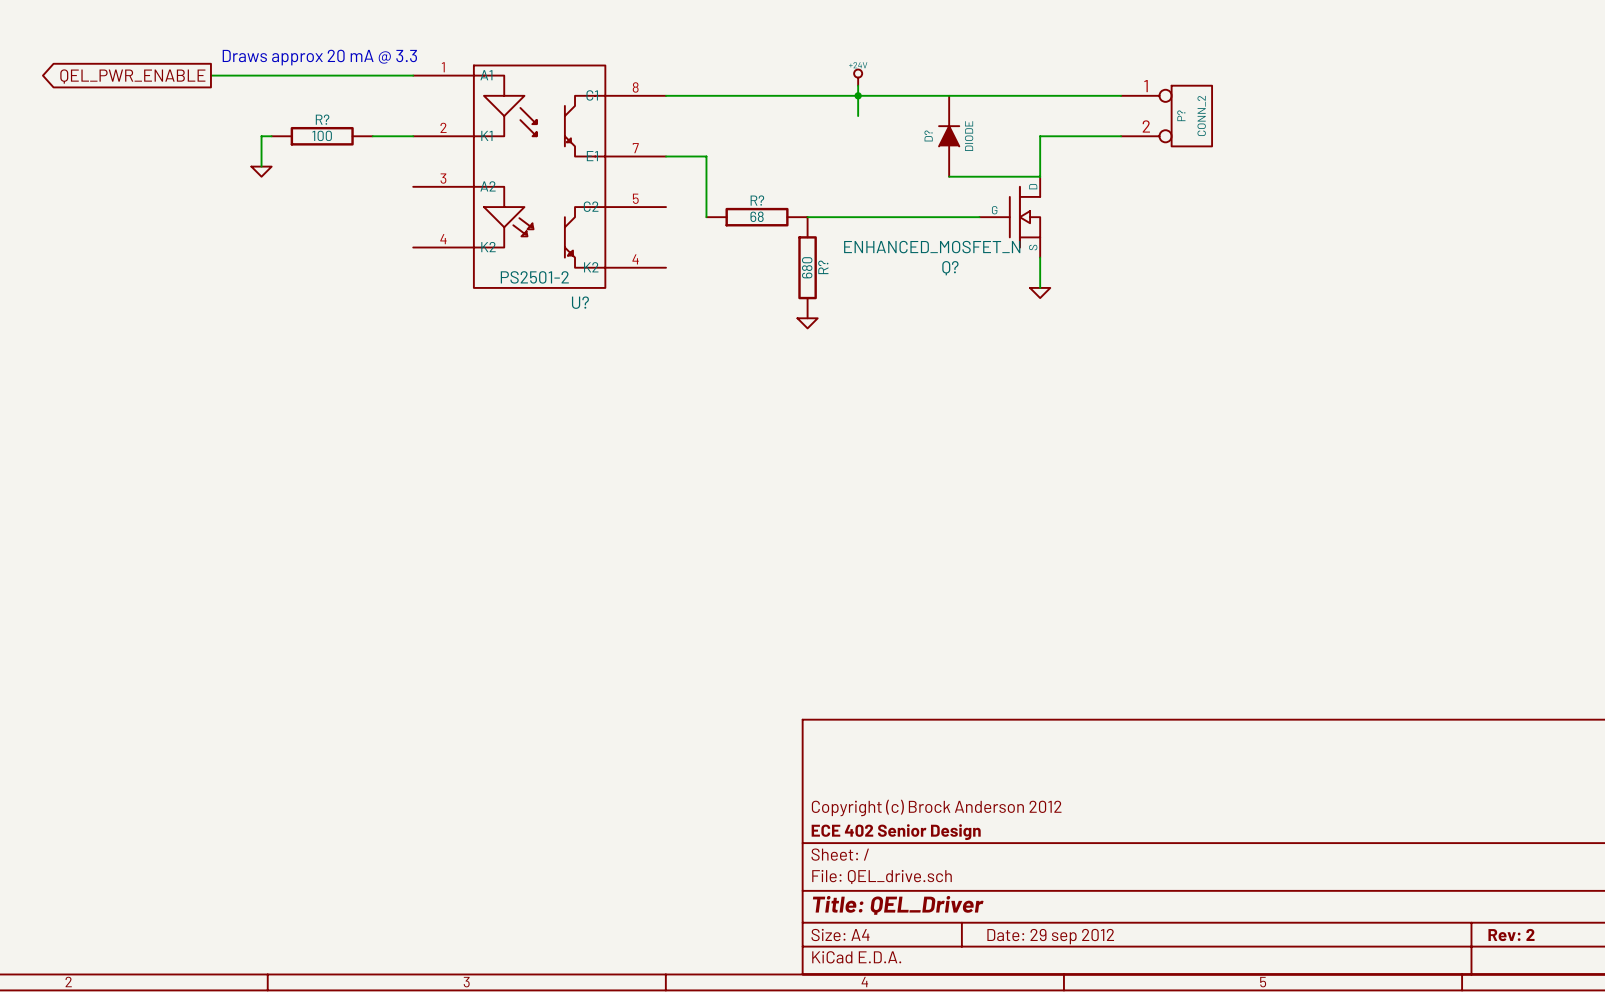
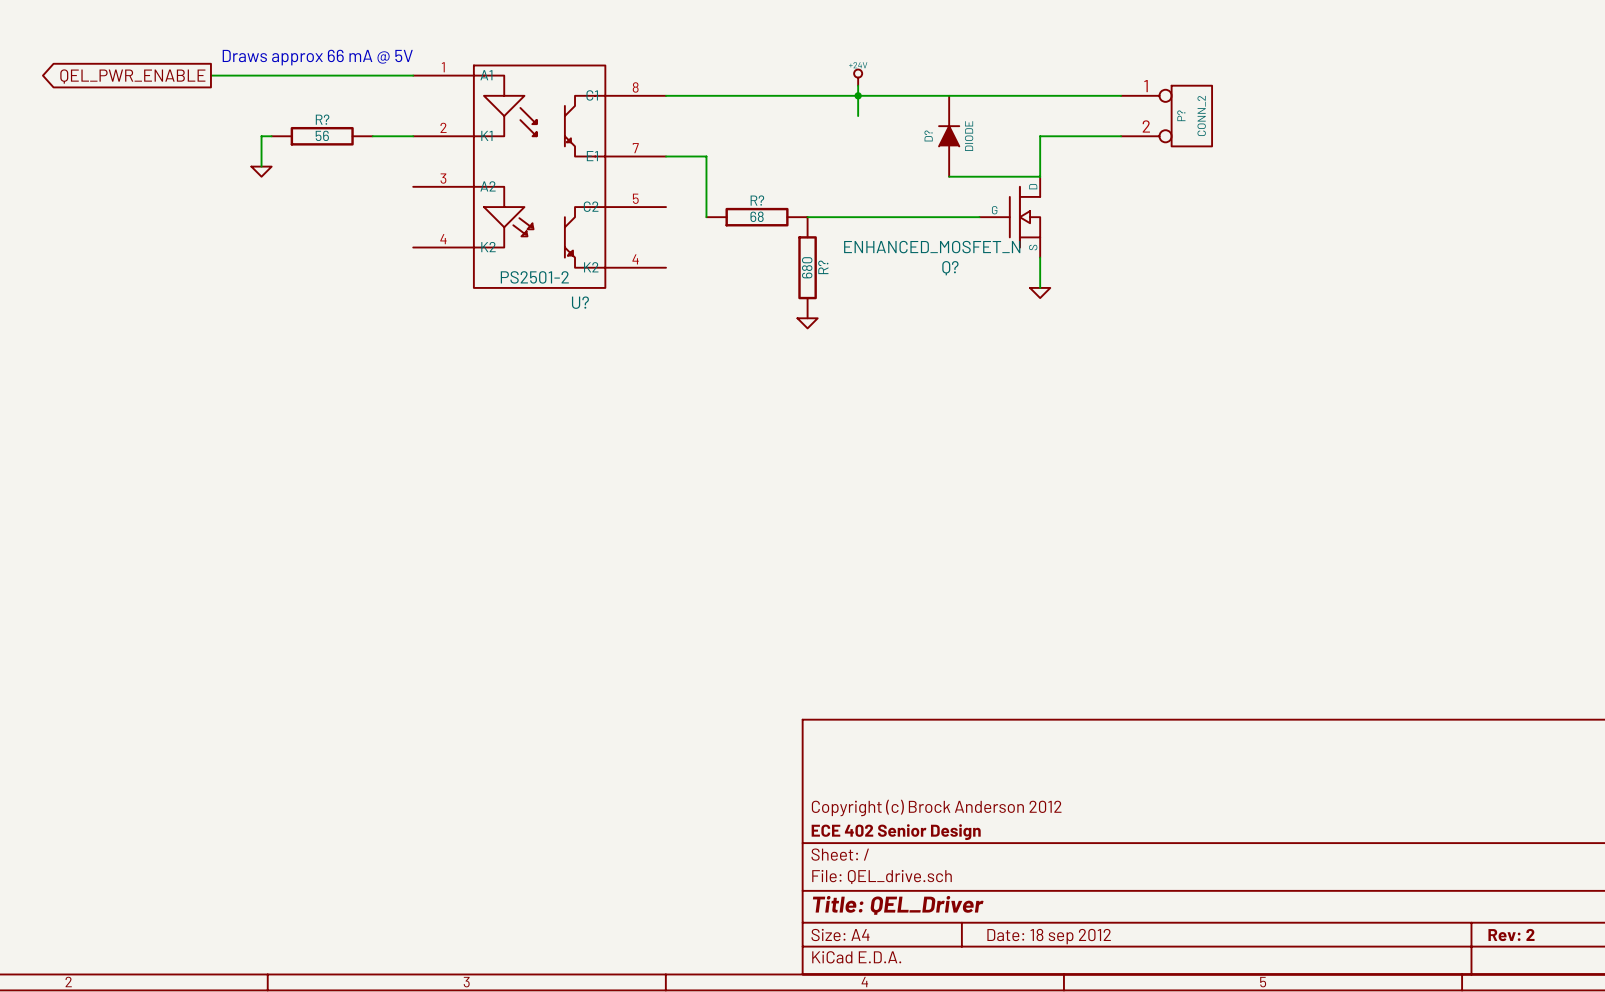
text: Draws approx 20 mA @ 3.3 (319, 57) -> Draws approx 66 mA @ 5V (317, 57)
R? value: 100 (322, 135) -> 56 (322, 135)
title block: Date: 29 sep 2012 (1050, 936) -> Date: 18 sep 2012 (1049, 936)

